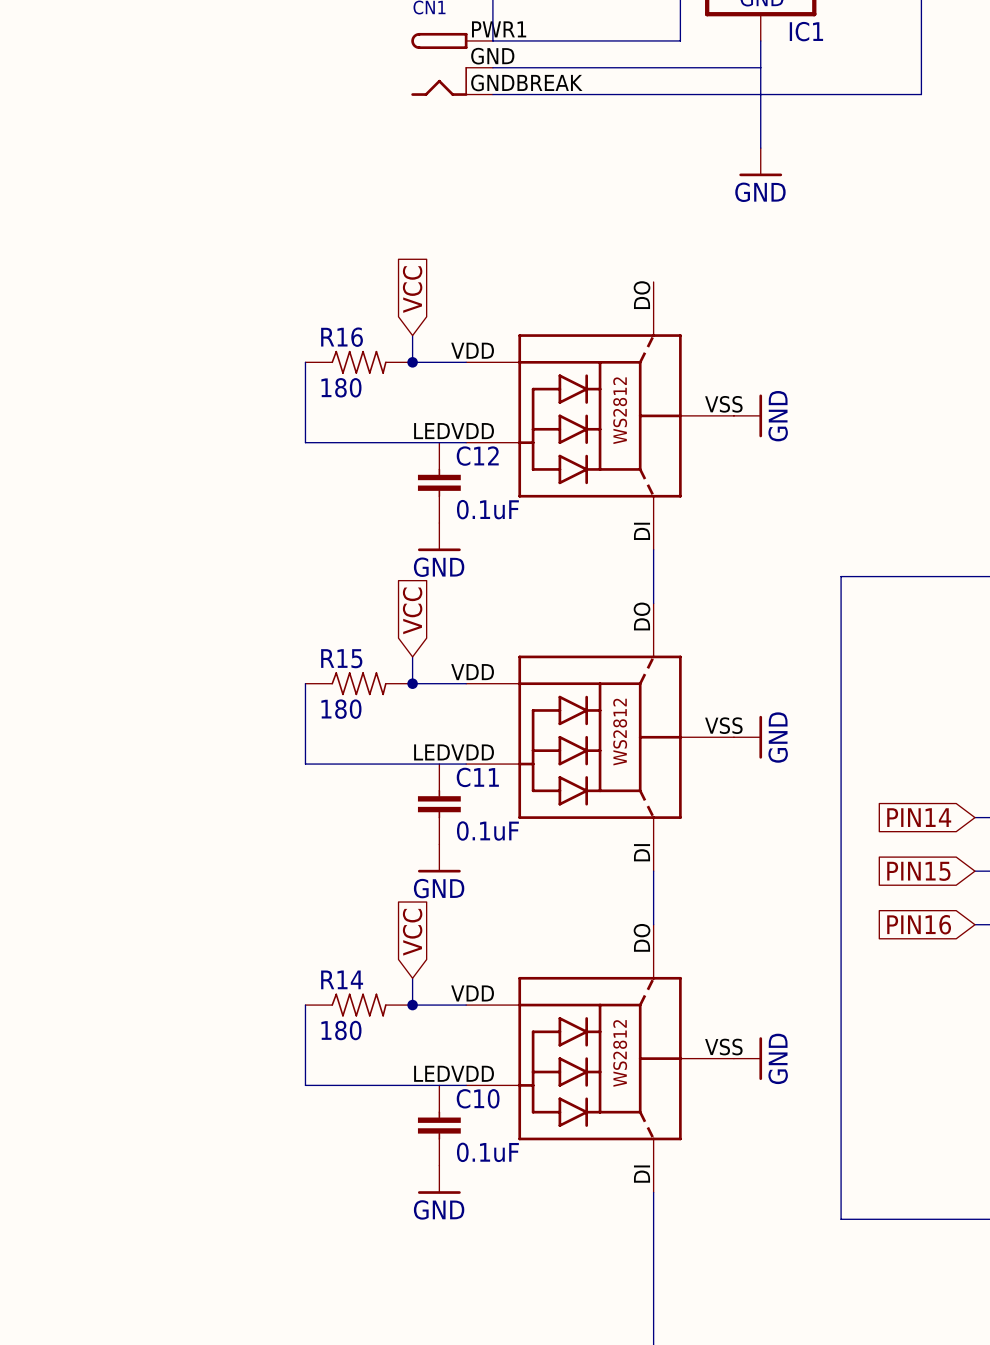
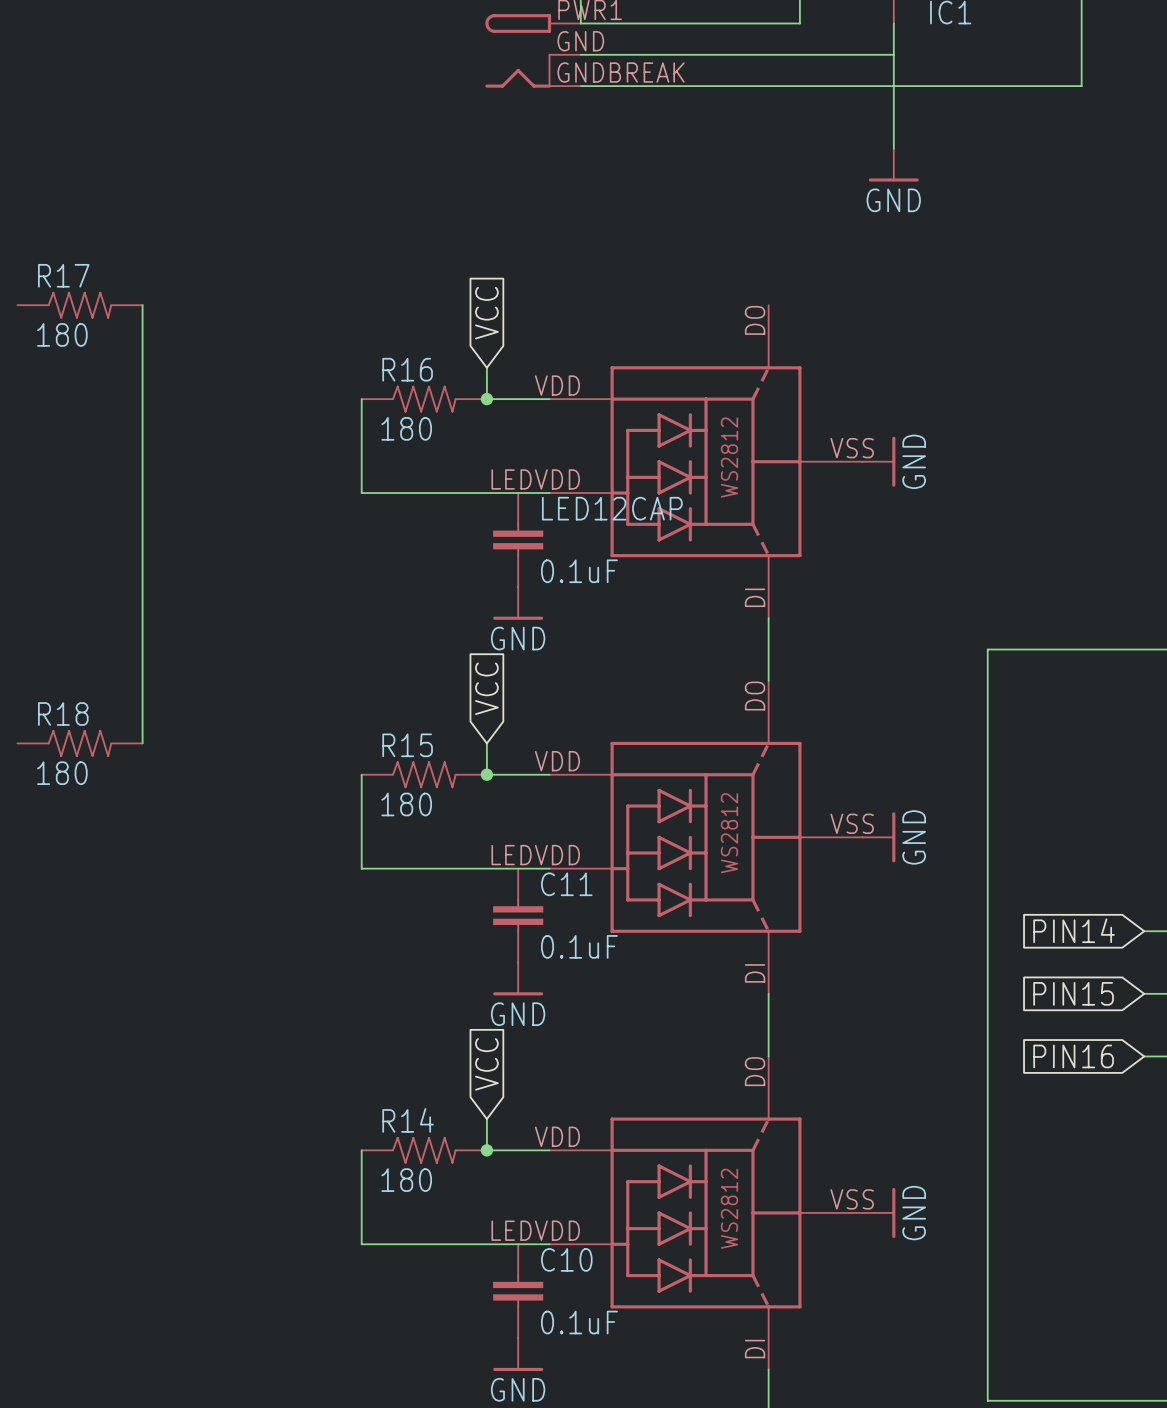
R17: none -> 180 (79, 305)
wire: none -> (142, 305) (142, 743)
C12 name: C12 (477, 456) -> LED12CAP (612, 508)
R18: none -> 180 (79, 743)

